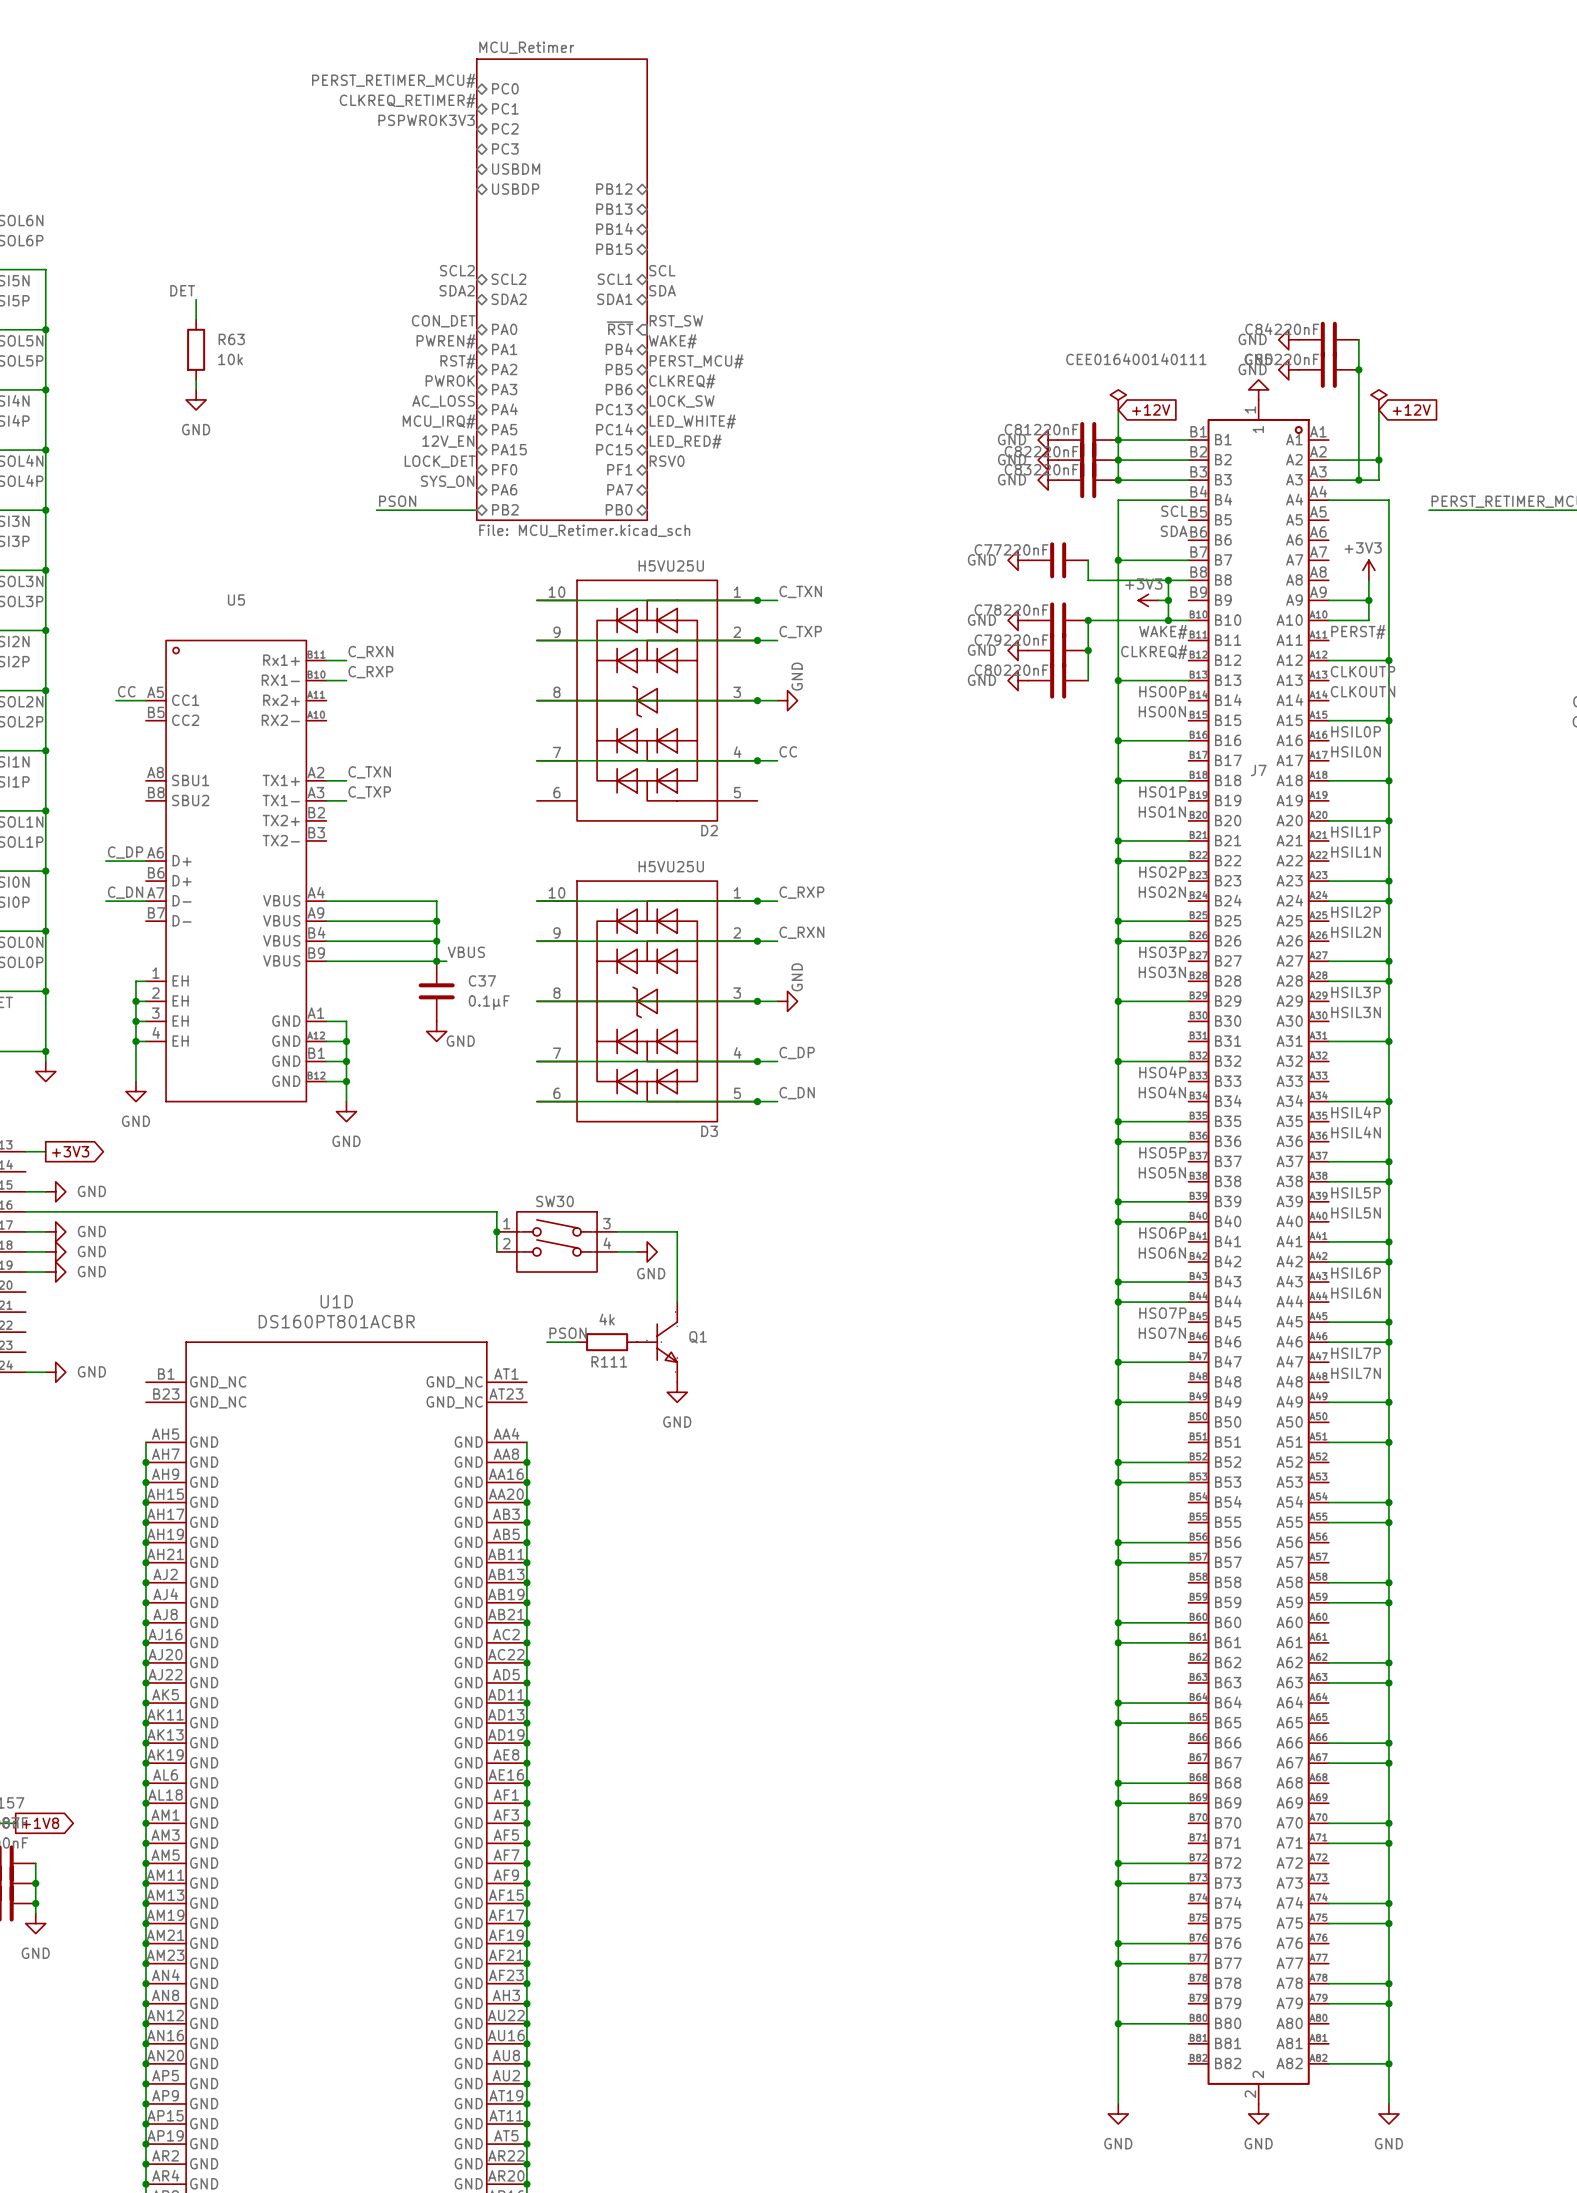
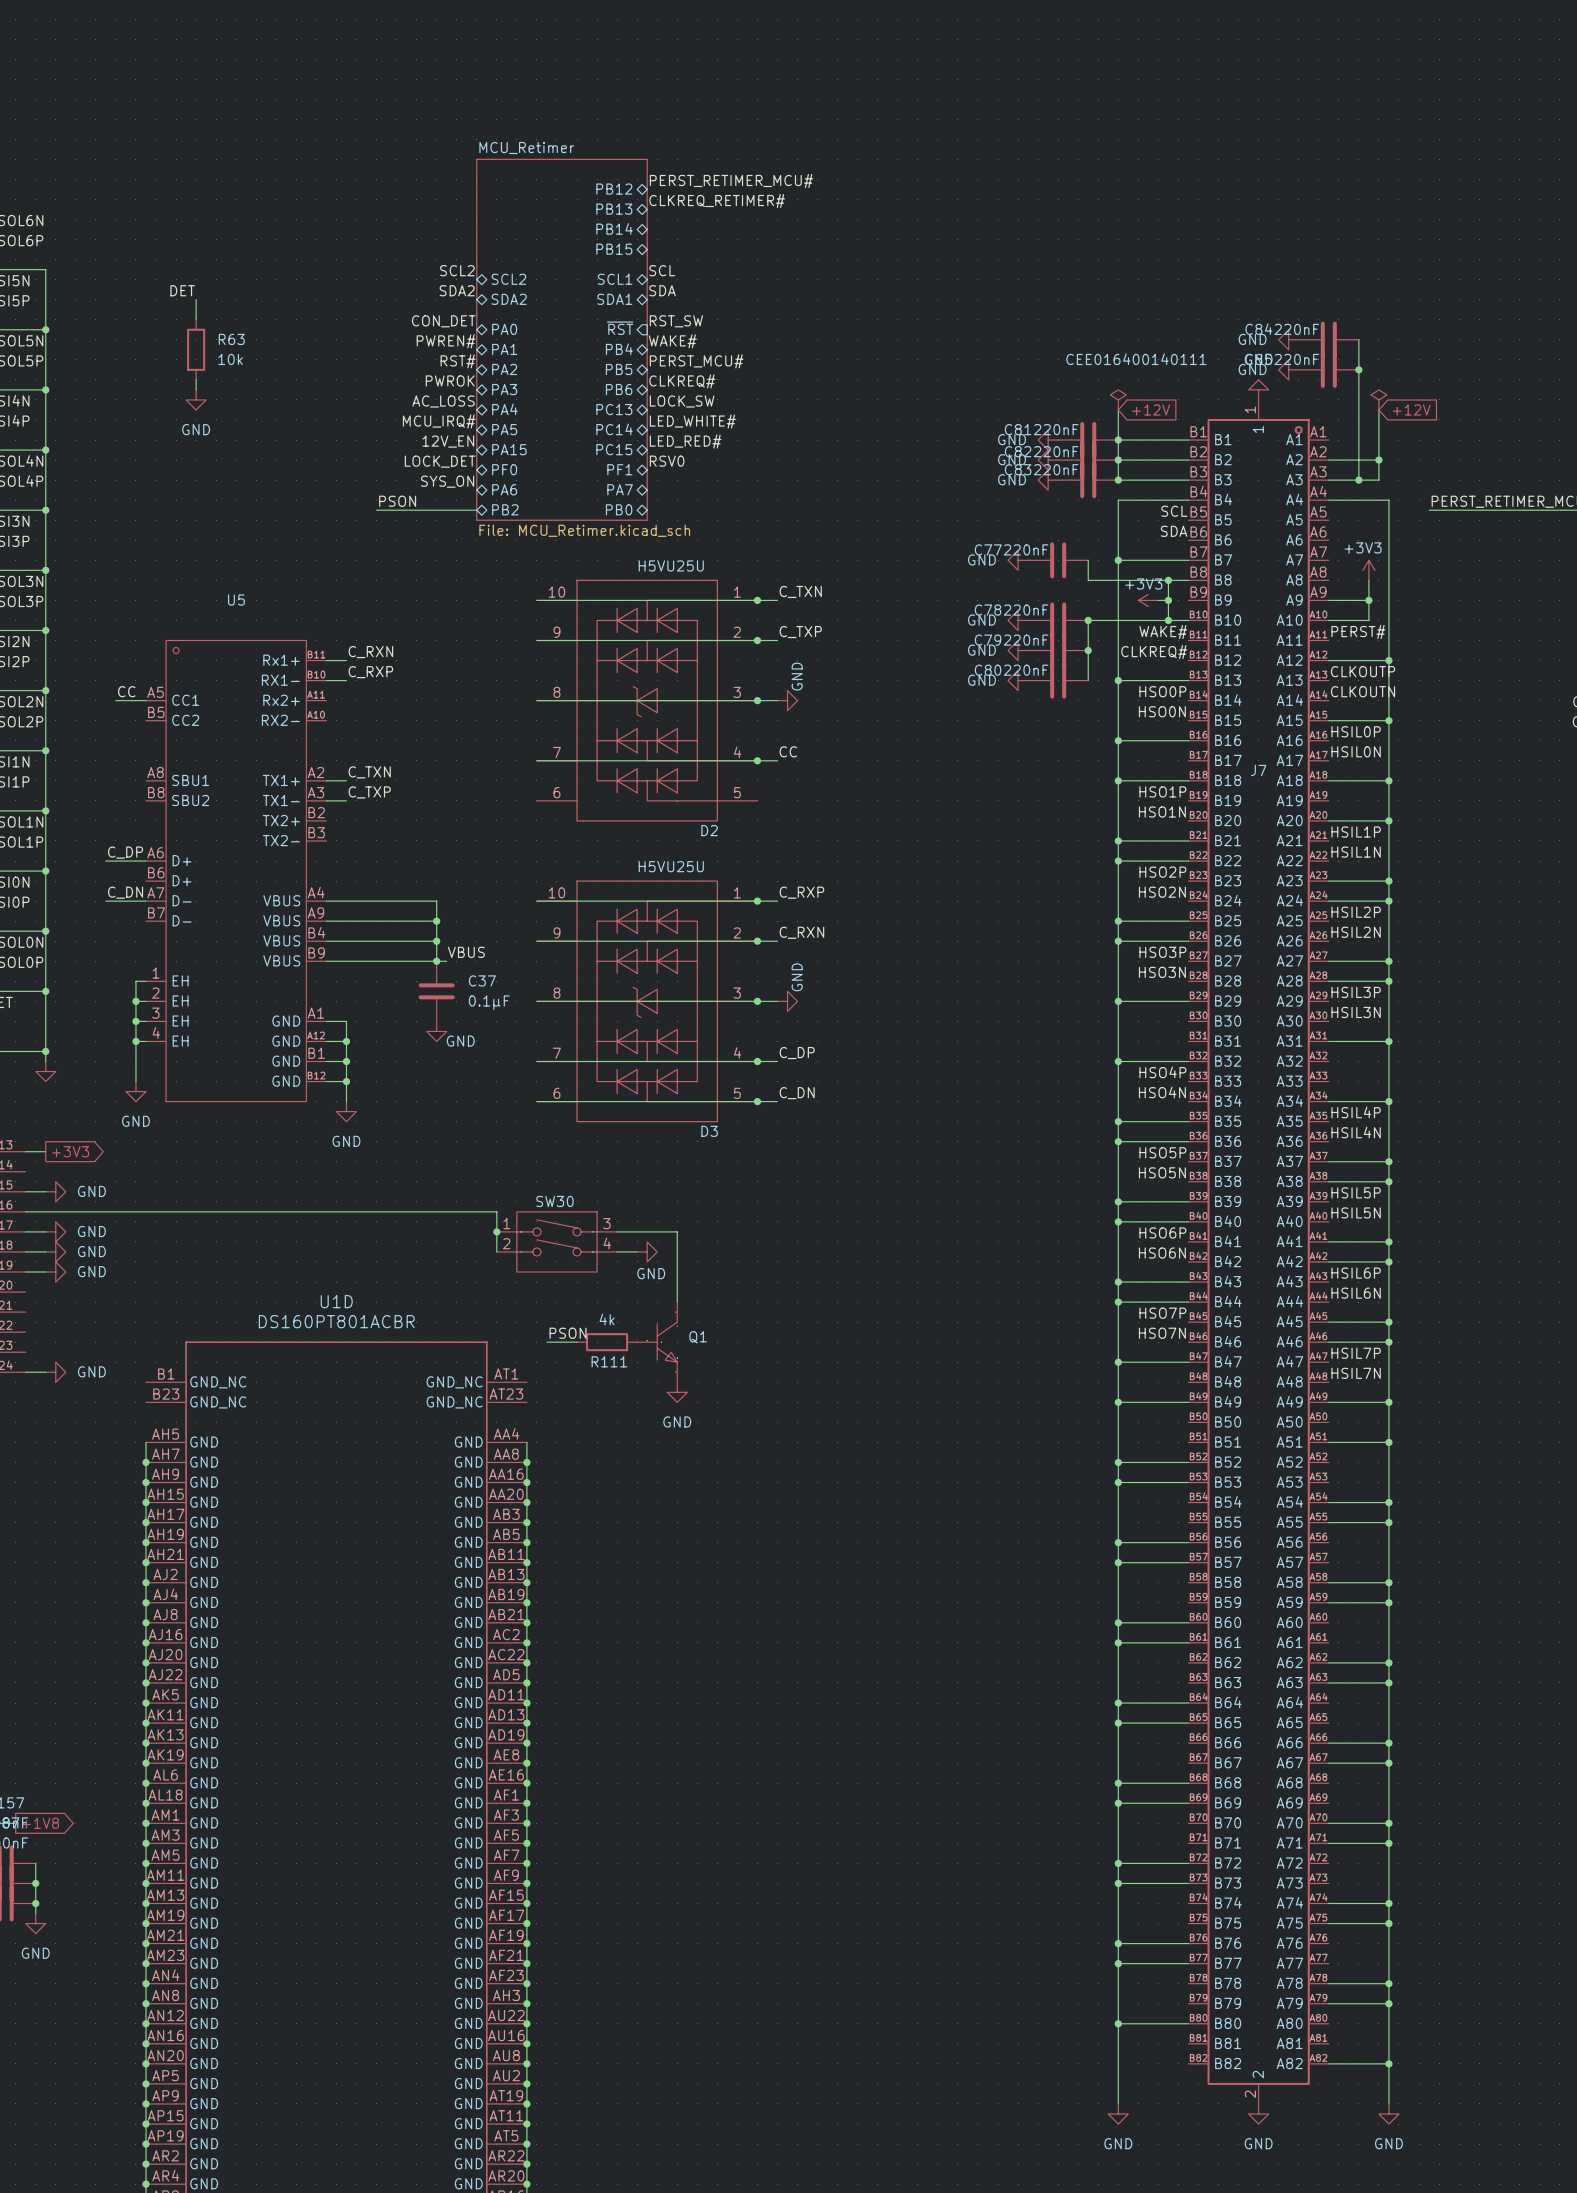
label: PERST_RETIMER_MCU# (393, 80) -> none
sheet pin: PC0 (505, 88) -> none
label: CLKREQ_RETIMER# (407, 100) -> none
sheet pin: PC1 (505, 108) -> none
label: PSPWROK3V3 (426, 120) -> none
sheet pin: PC2 (505, 128) -> none
sheet pin: PC3 (505, 148) -> none
sheet pin: USBDM (516, 169) -> none
label: none -> PERST_RETIMER_MCU# (731, 180)
sheet pin: USBDP (515, 189) -> none
label: none -> CLKREQ_RETIMER# (717, 201)
sheet MCU_Retimer: File: MCU_Retimer.kicad_sch (561, 289) -> none
sheet MCU_Retimer: none -> File: MCU_Retimer.kicad_sch (561, 339)

